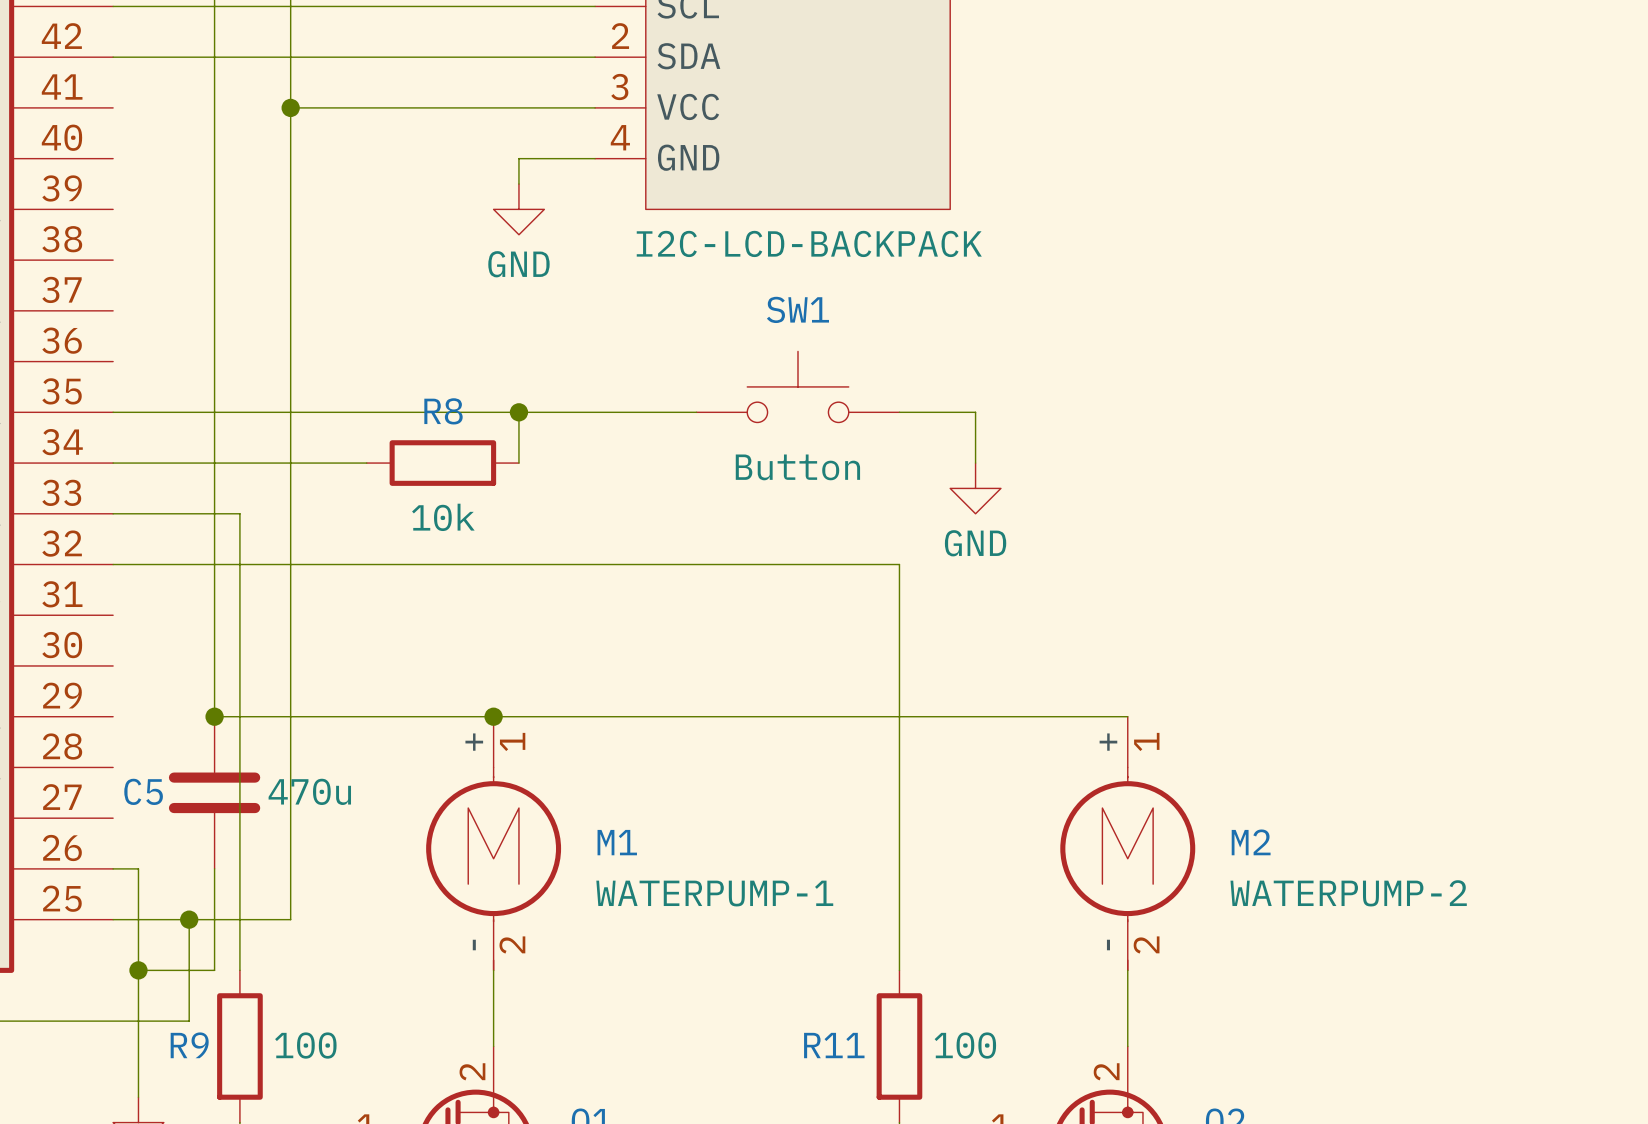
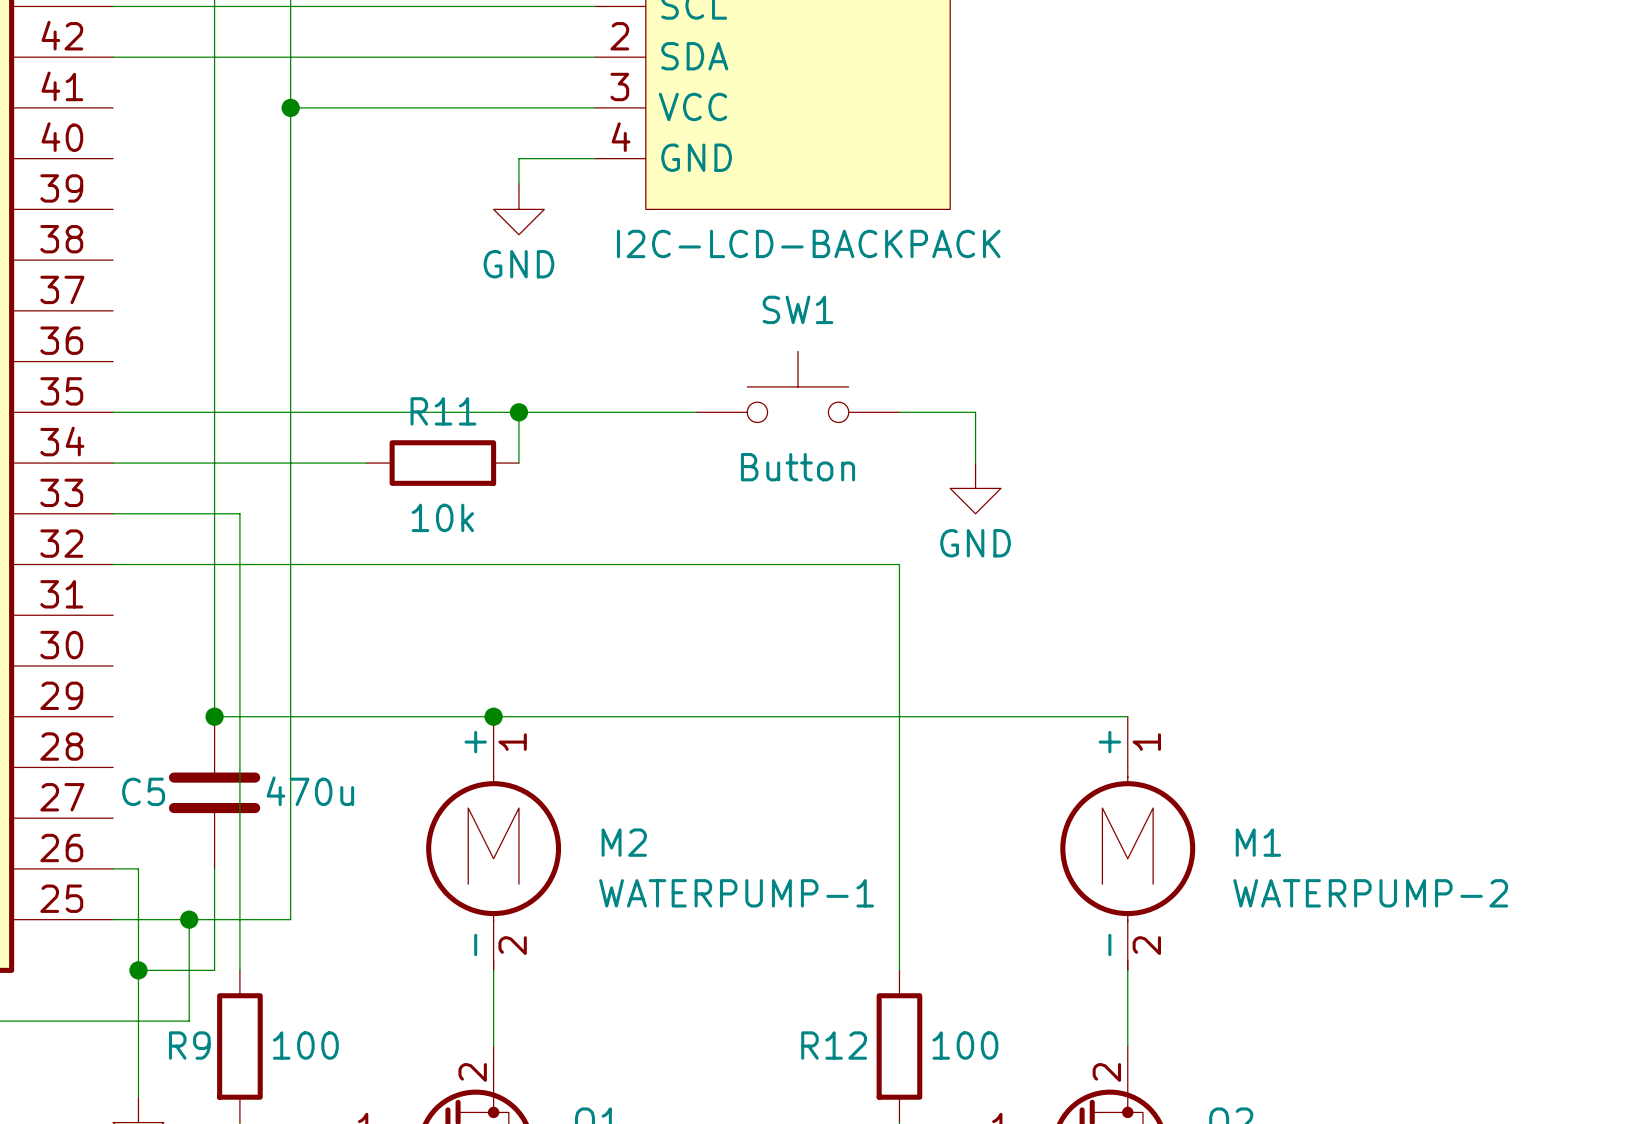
R8 name: R8 (443, 411) -> R11 (443, 411)
M1 name: M1 (617, 842) -> M2 (624, 842)
M2 name: M2 (1251, 842) -> M1 (1258, 842)
R11 name: R11 (834, 1045) -> R12 (834, 1045)

